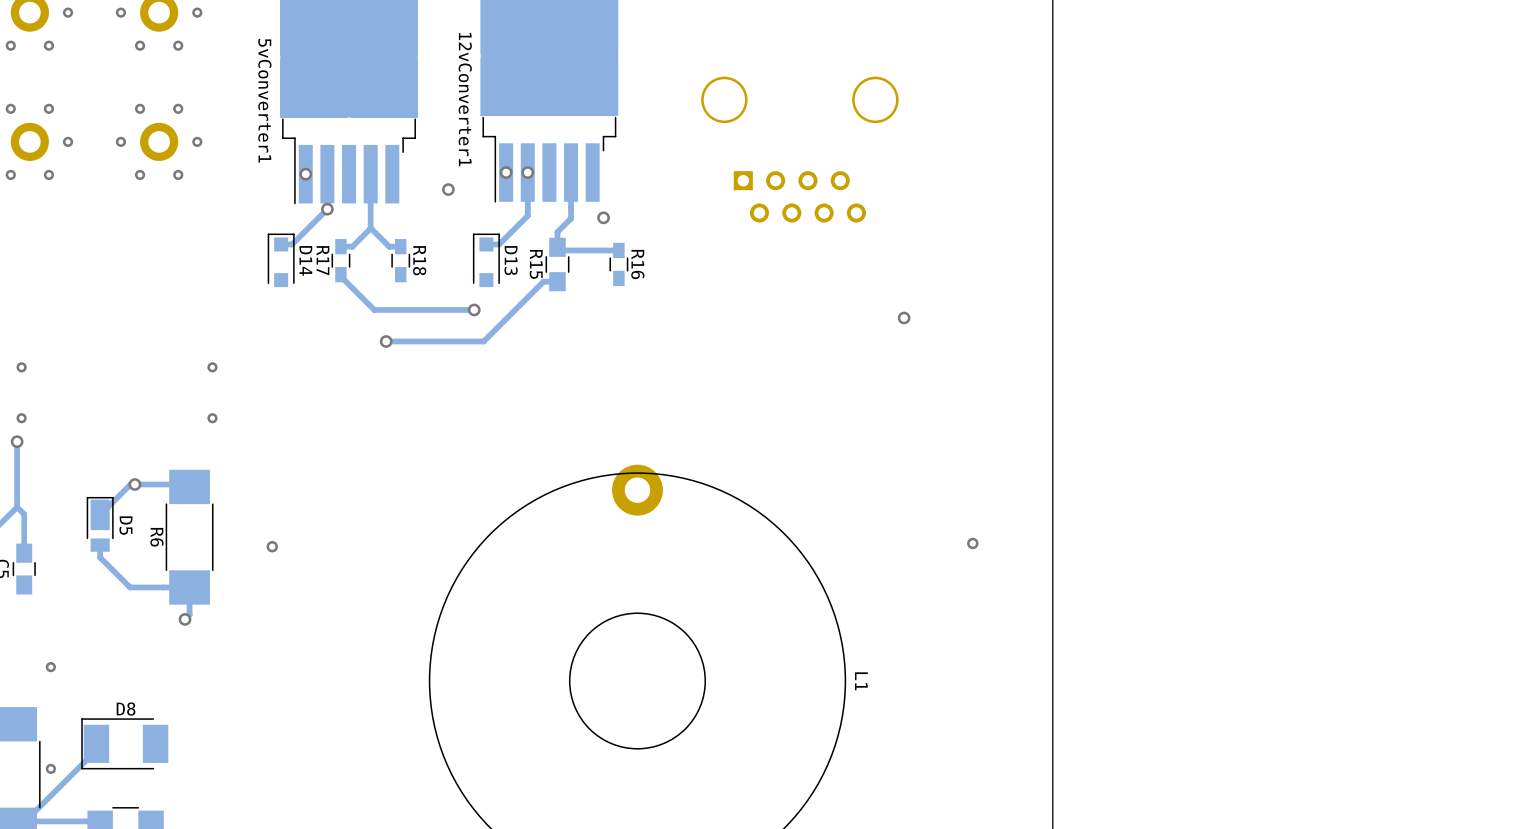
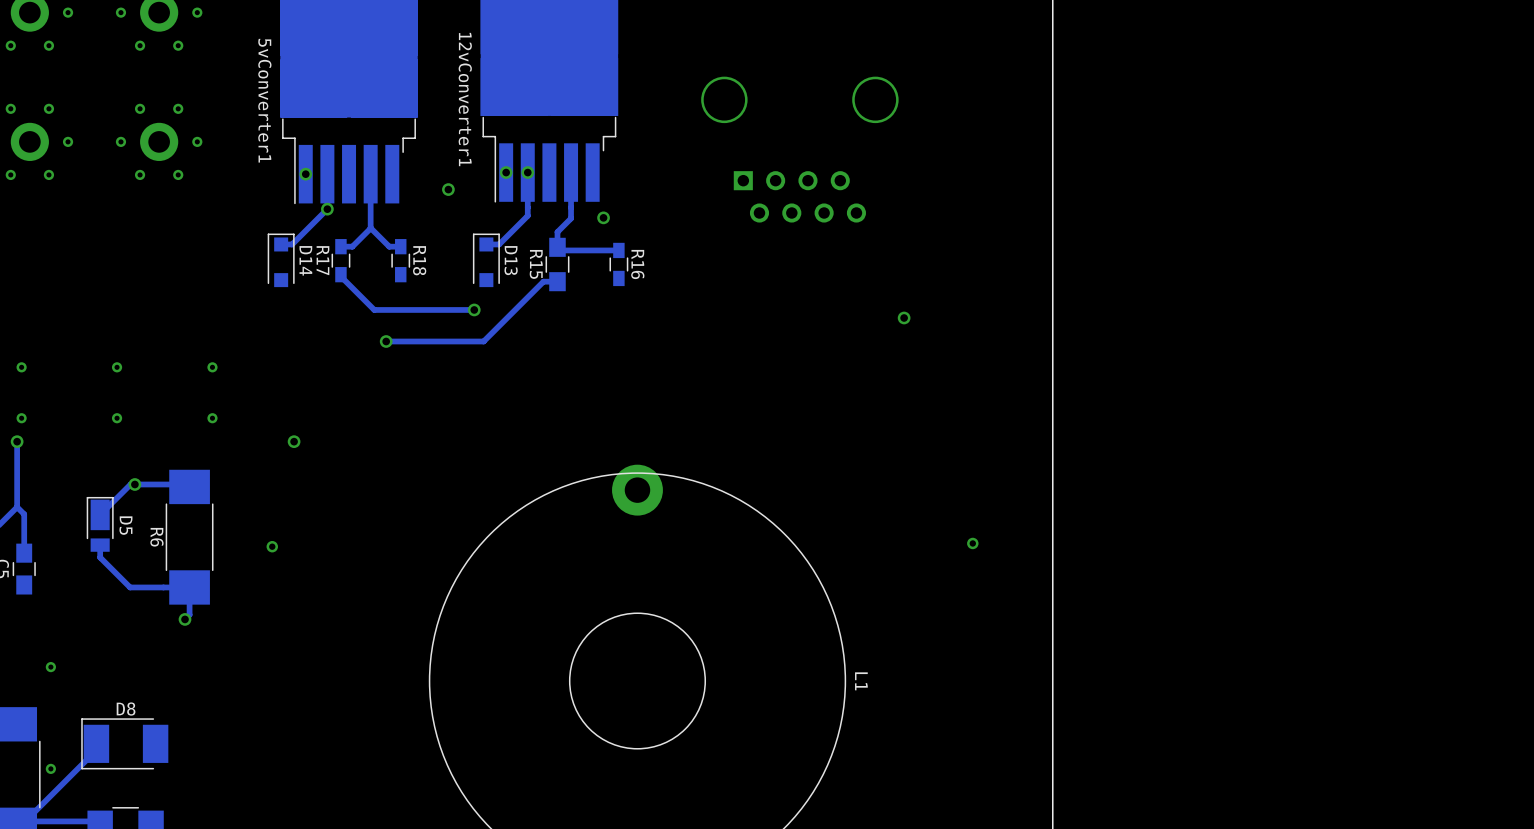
via: none -> (117, 367)
via: none -> (117, 418)
via: none -> (294, 441)

